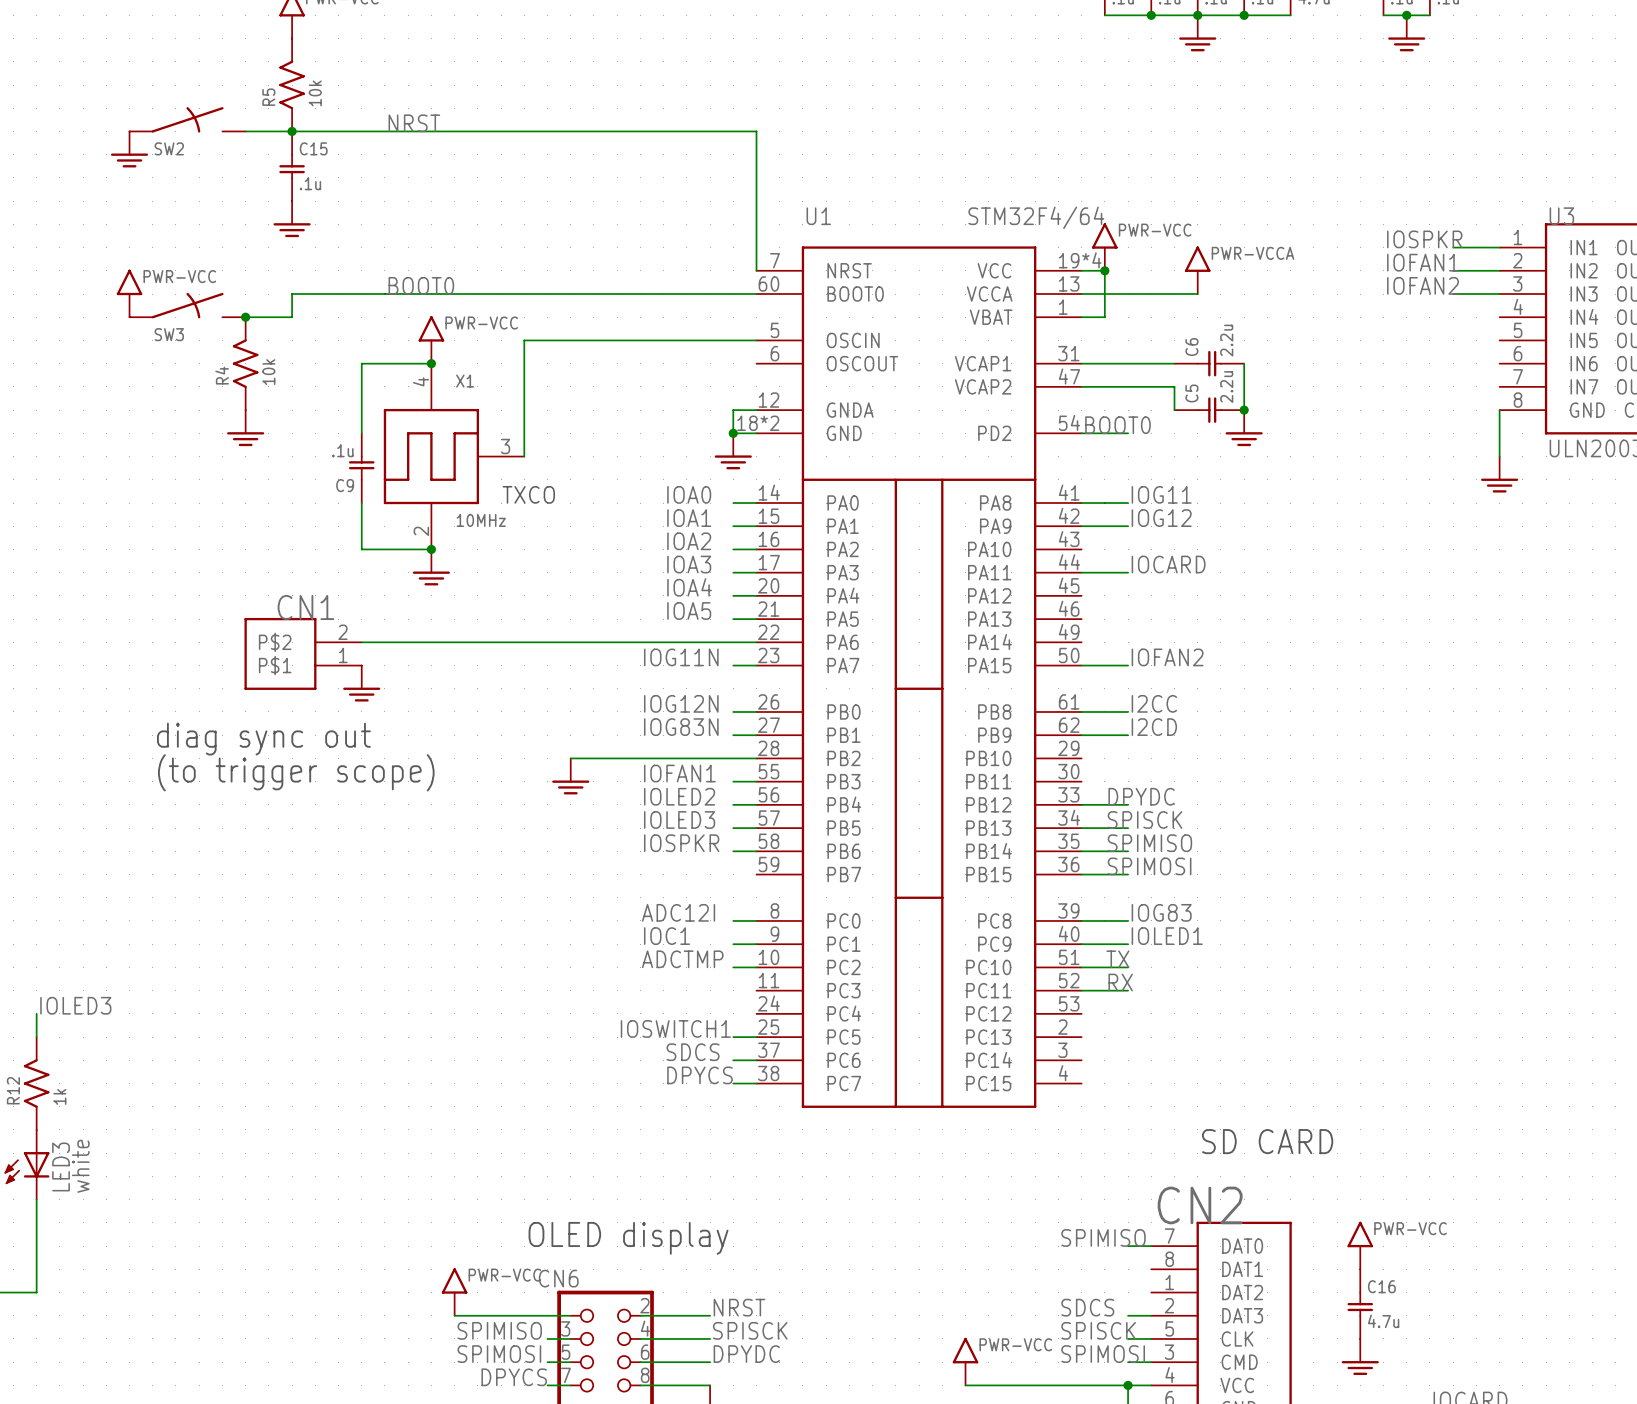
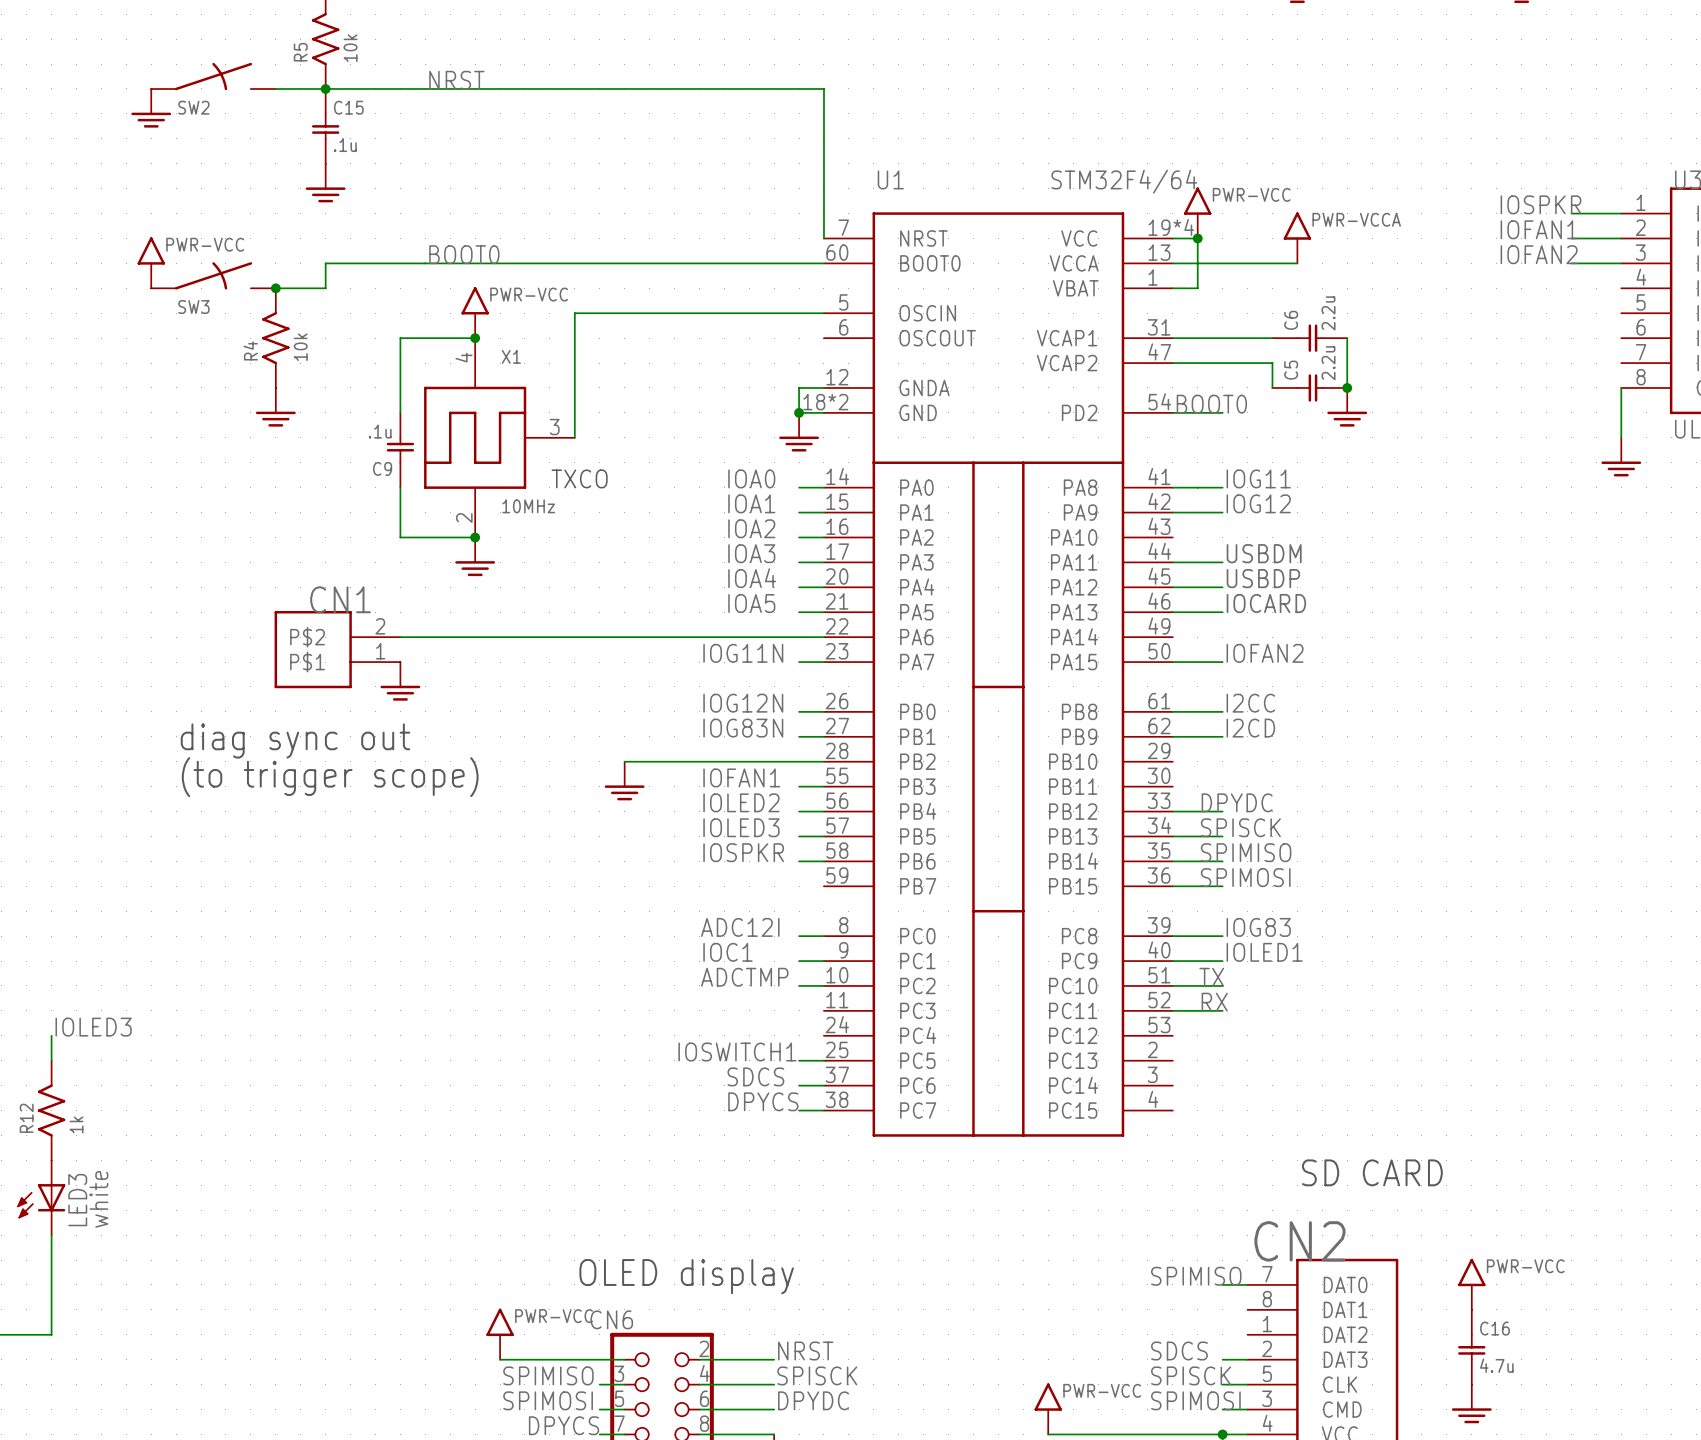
label: IOCARD (1168, 564) -> USBDM (1264, 553)
label: none -> USBDP (1263, 578)
wire: none -> (1172, 587) (1222, 587)
label: none -> IOCARD (1266, 603)
wire: none -> (1172, 612) (1222, 612)

